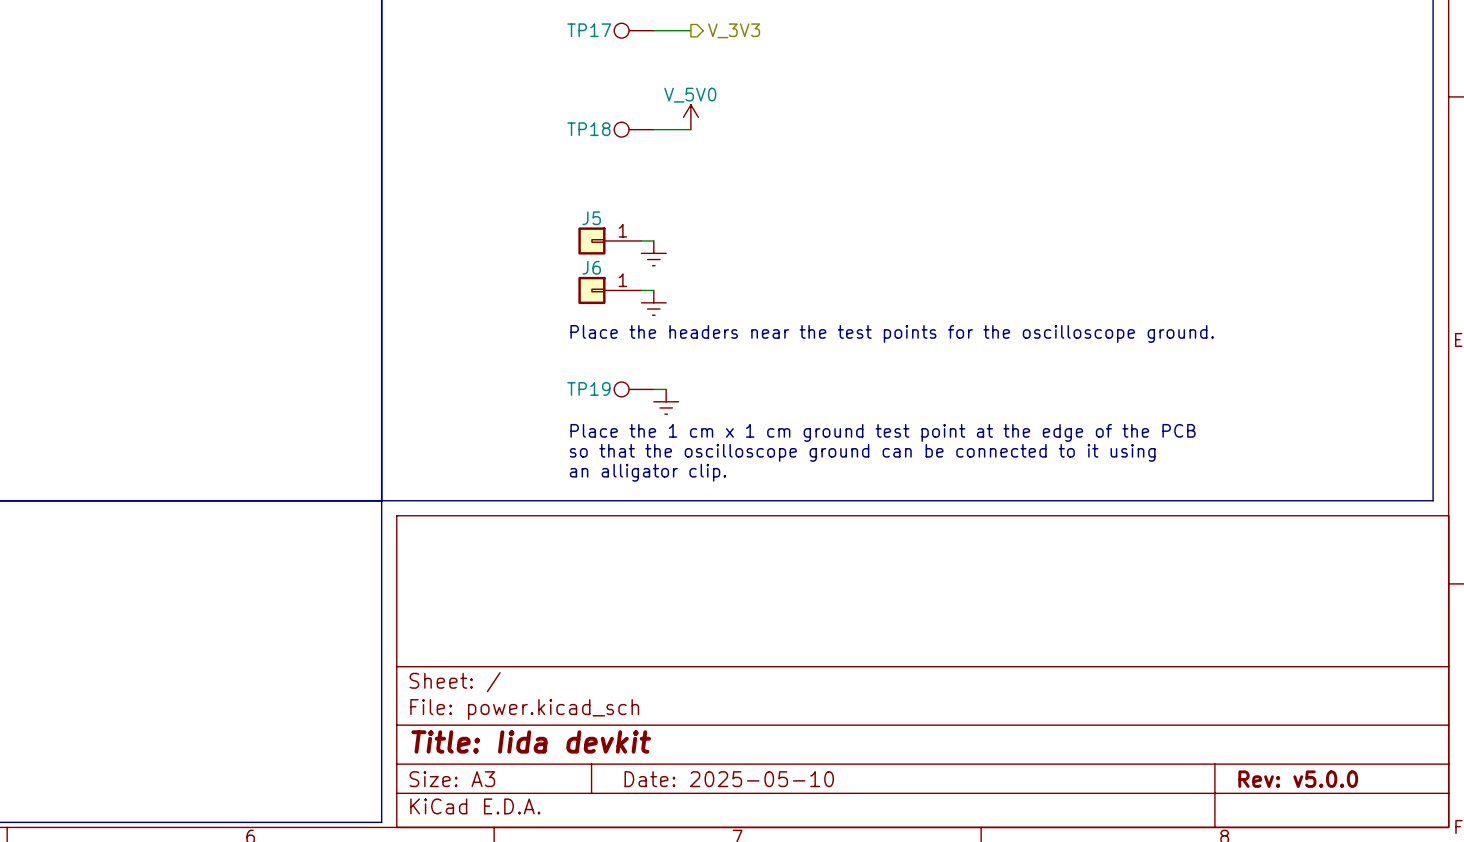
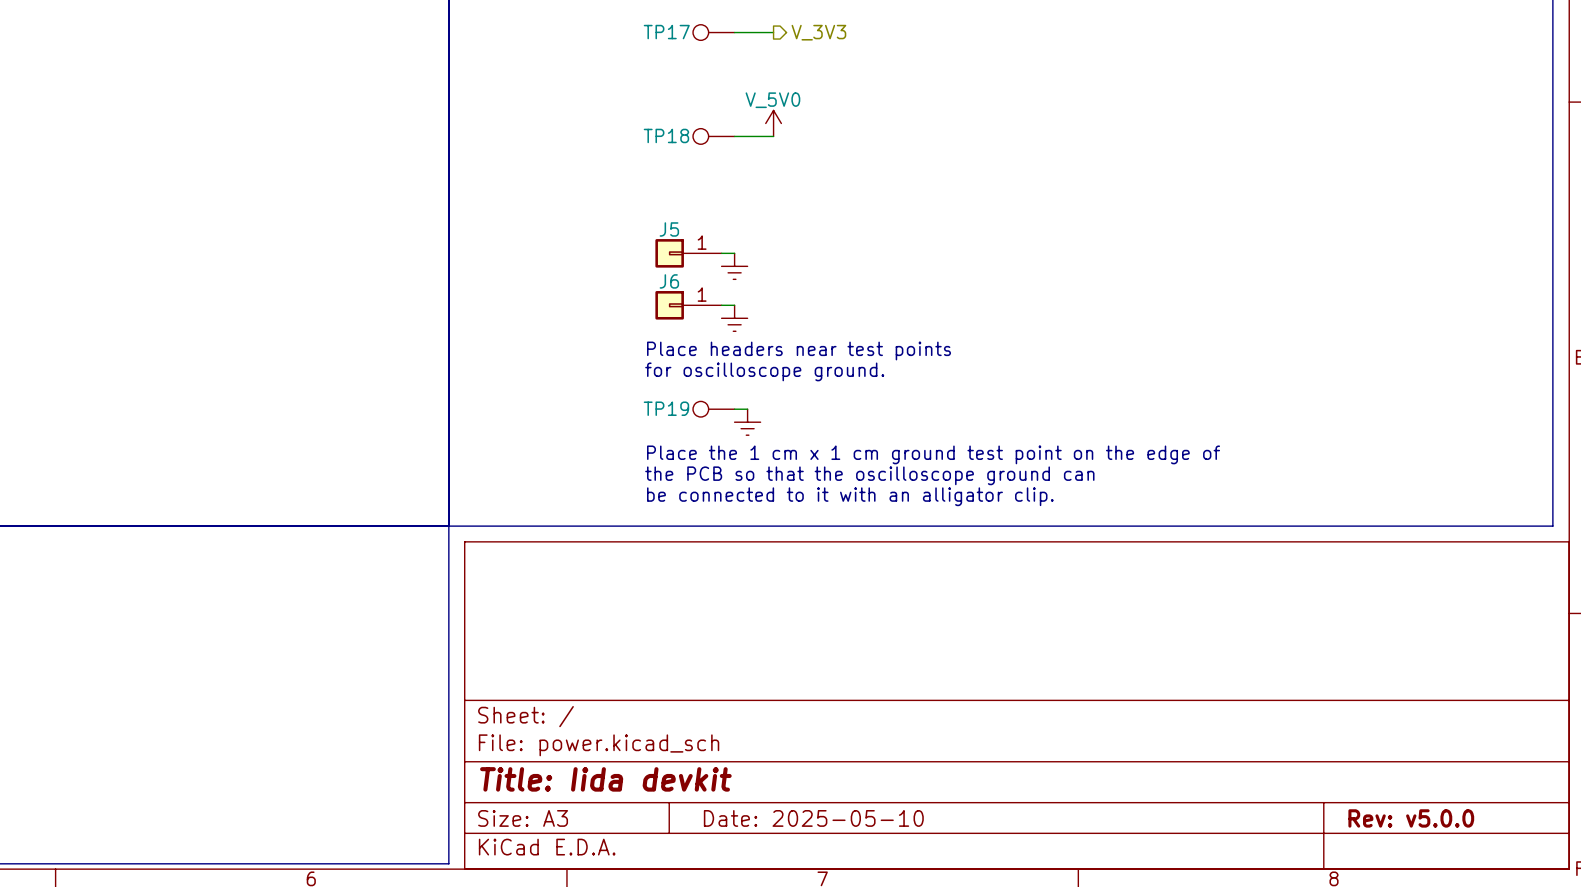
text: Place the headers near the test points for the oscilloscope ground. (892, 333) -> Place headers near test points (799, 350)
text: none -> for oscilloscope ground. (764, 371)
text: Place the 1 cm x 1 cm ground test point at the edge of the PCB (883, 432) -> Place the 1 cm x 1 cm ground test point on the edge of (933, 454)
text: so that the oscilloscope ground can be connected to it using (862, 452) -> the PCB so that the oscilloscope ground can (869, 475)
text: an alligator clip. (648, 472) -> be connected to it with an alligator clip. (850, 496)

